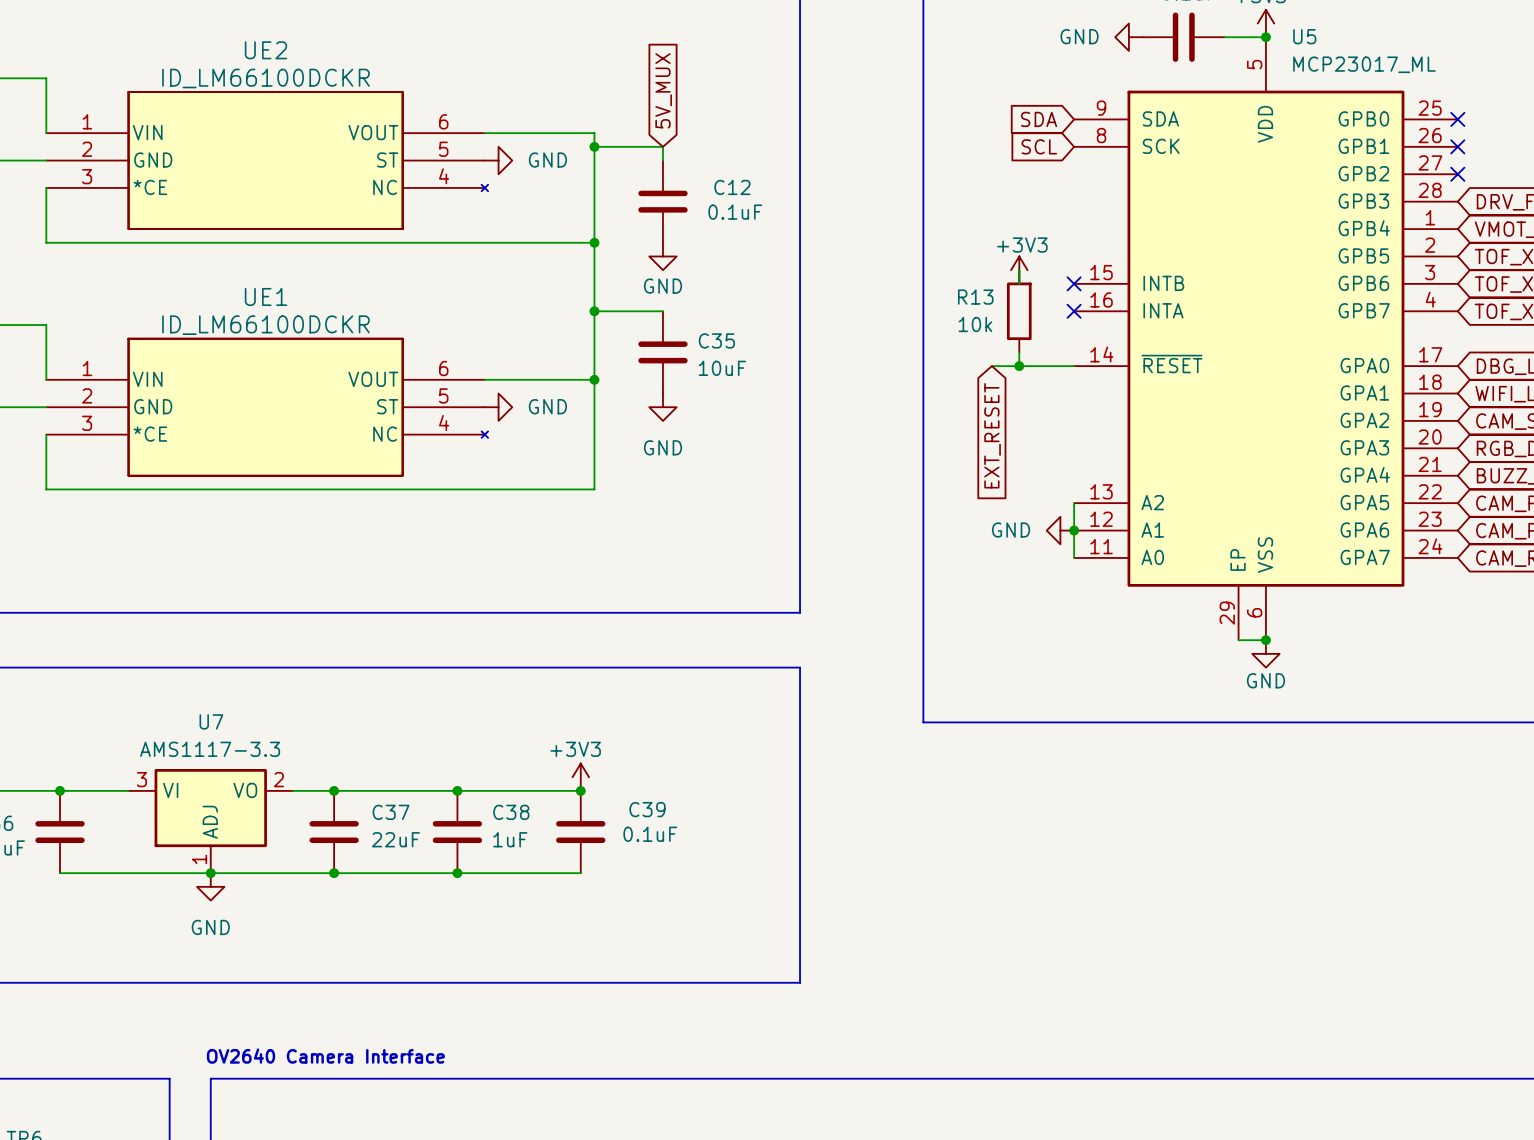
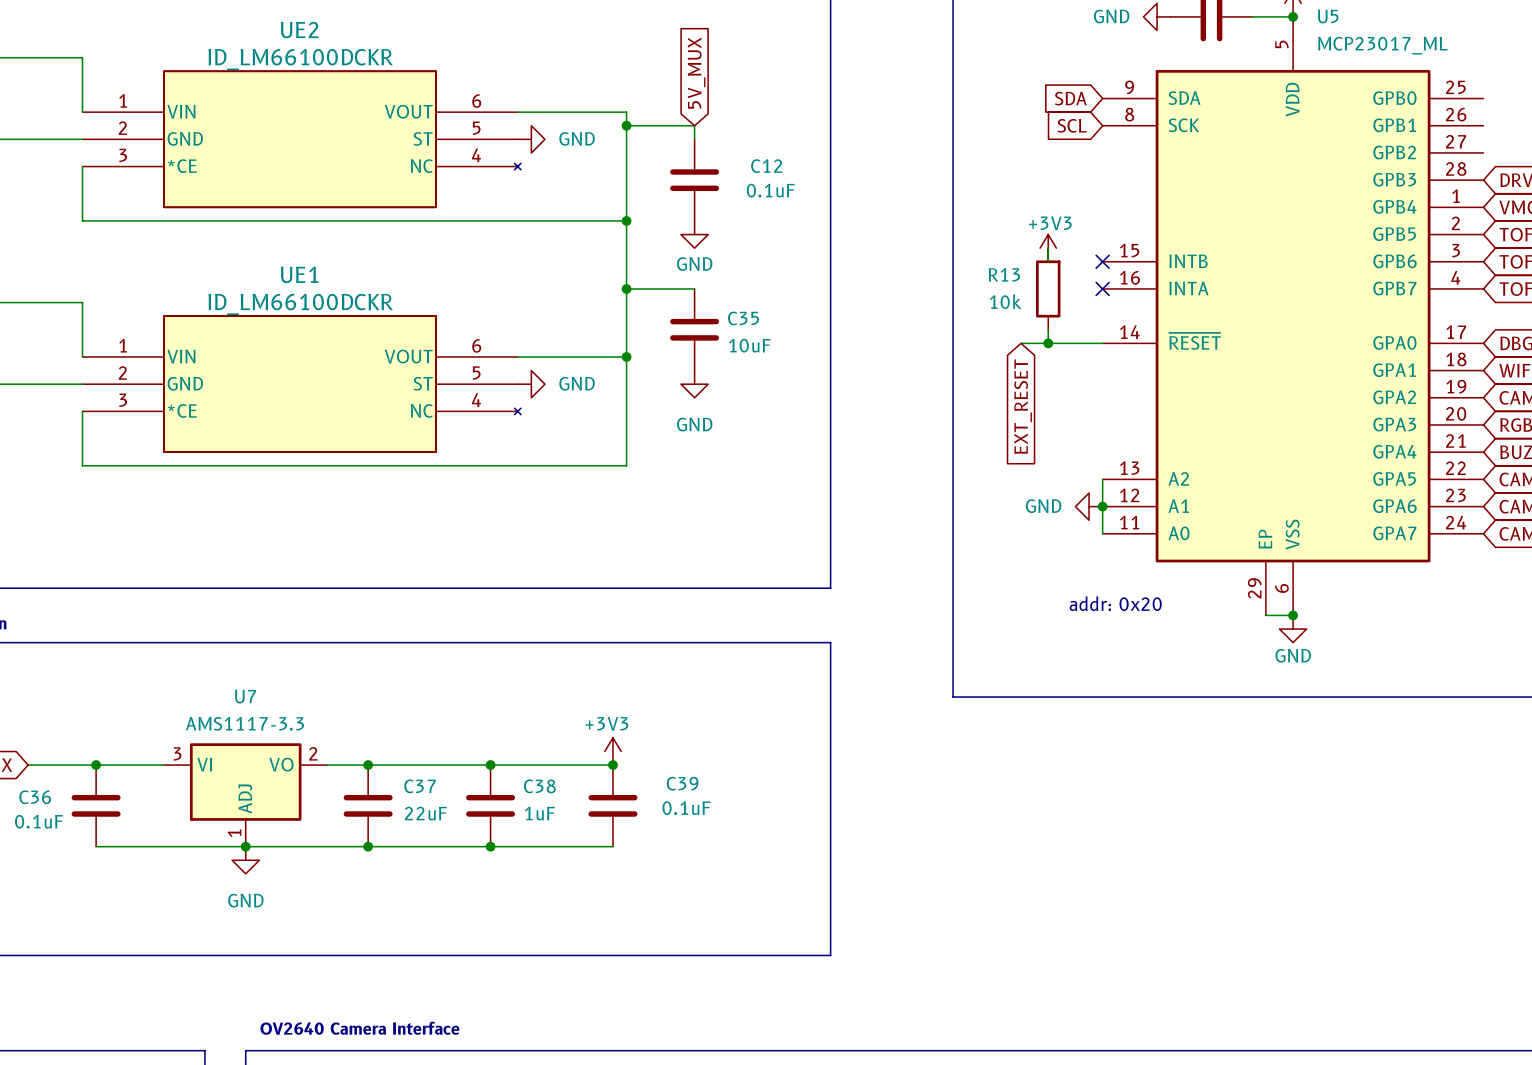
no-connect mark: (1457, 119) -> none
no-connect mark: (1457, 146) -> none
no-connect mark: (1457, 174) -> none
text: none -> addr: 0x20 (1115, 603)

